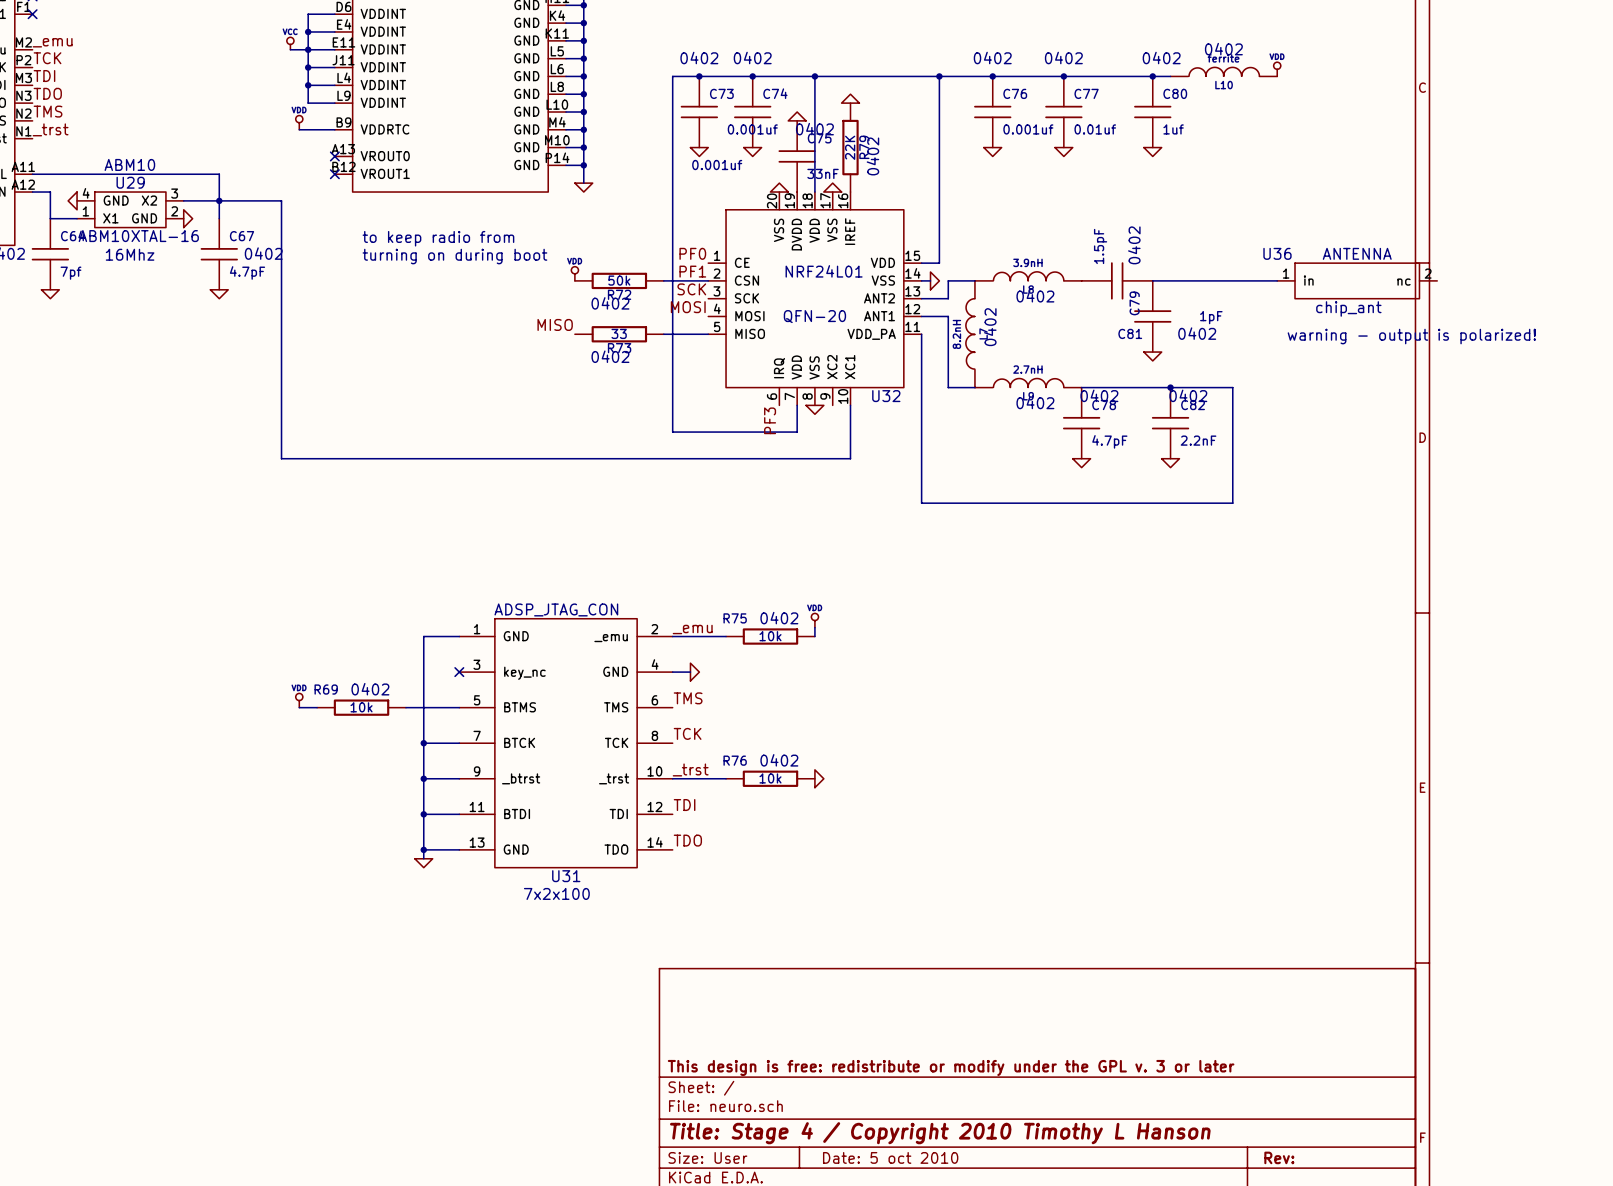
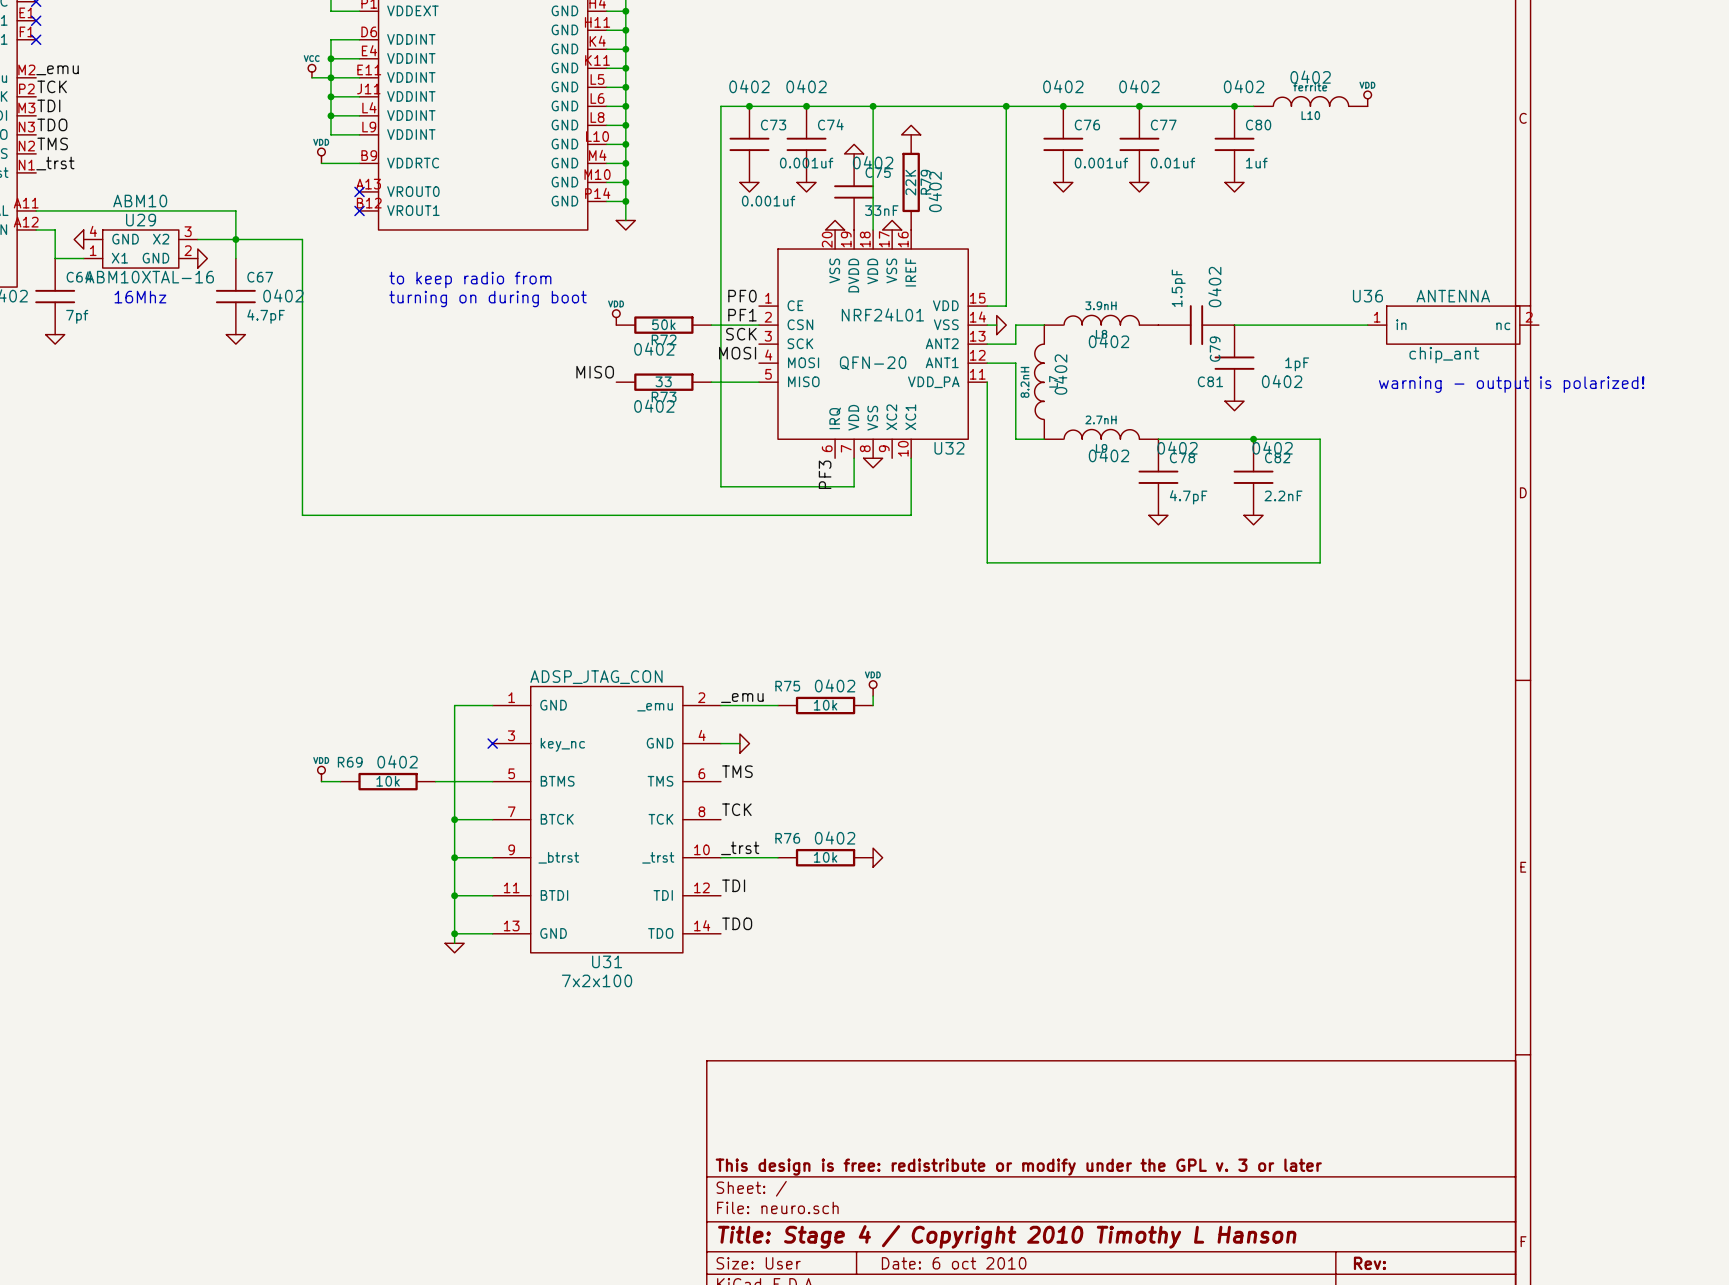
title block: Date: 5 oct 2010 (890, 1157) -> Date: 6 oct 2010 (954, 1263)

